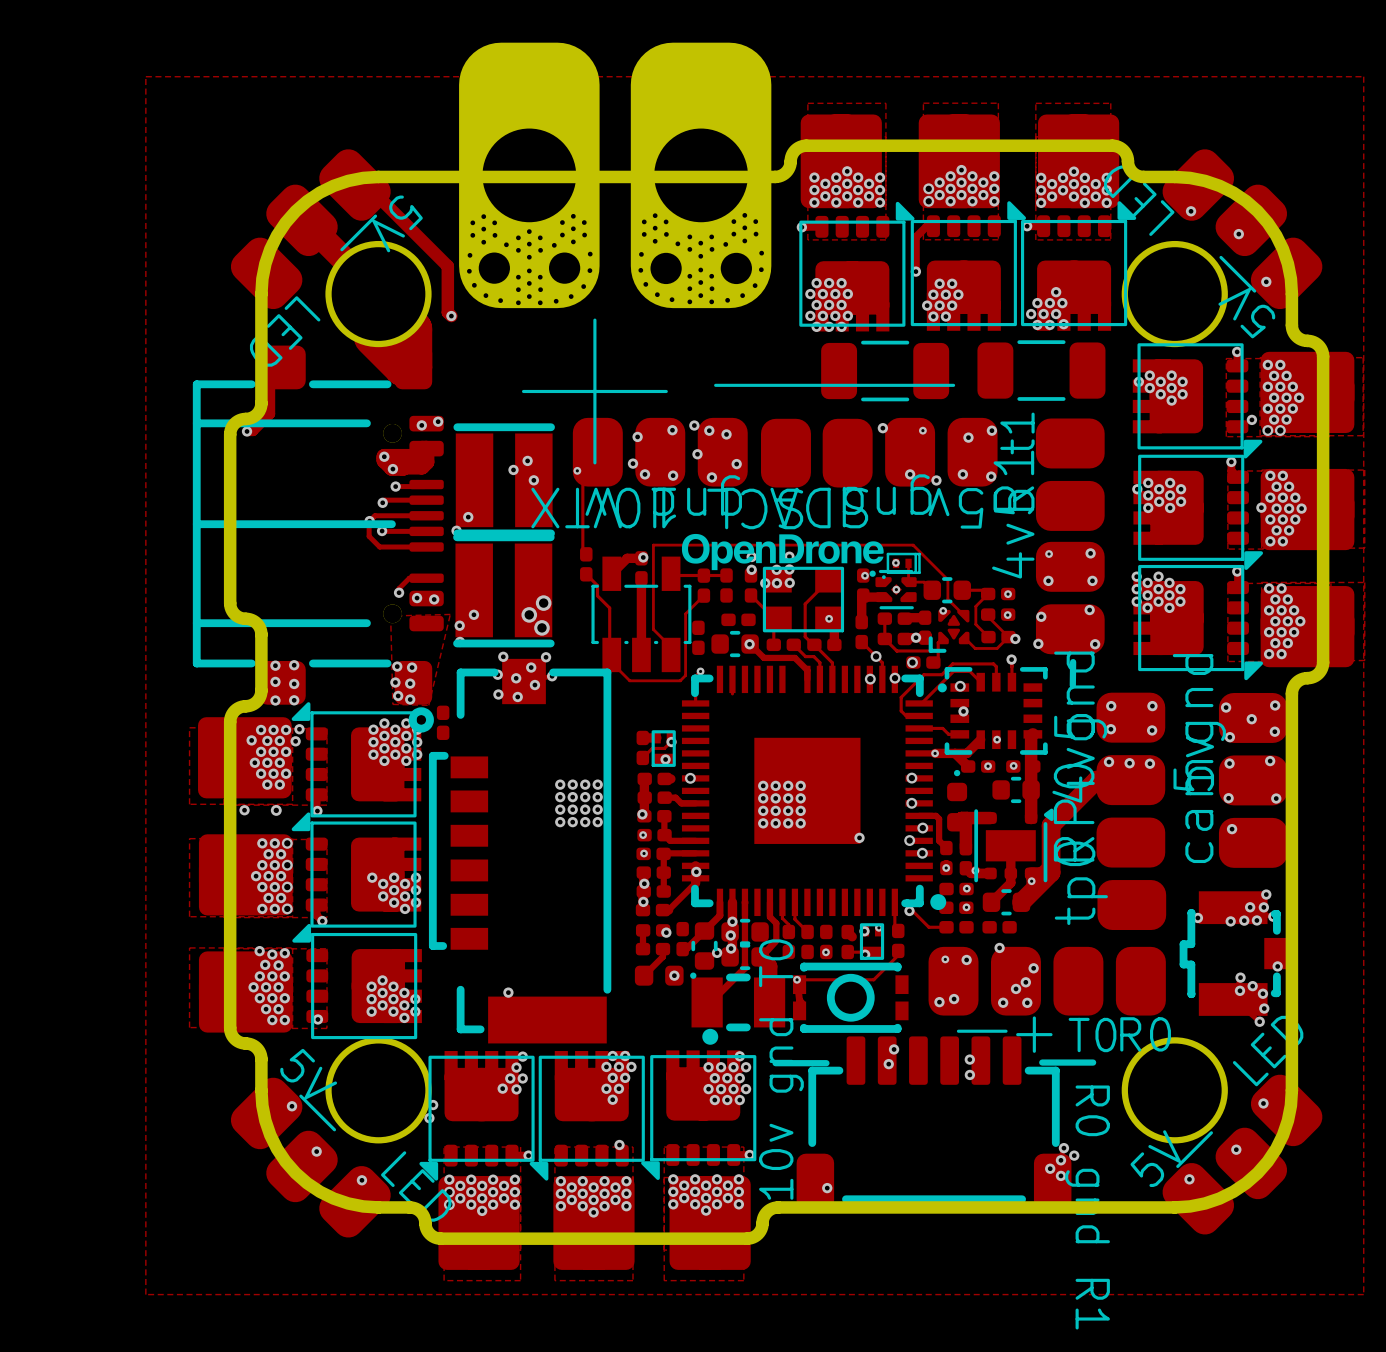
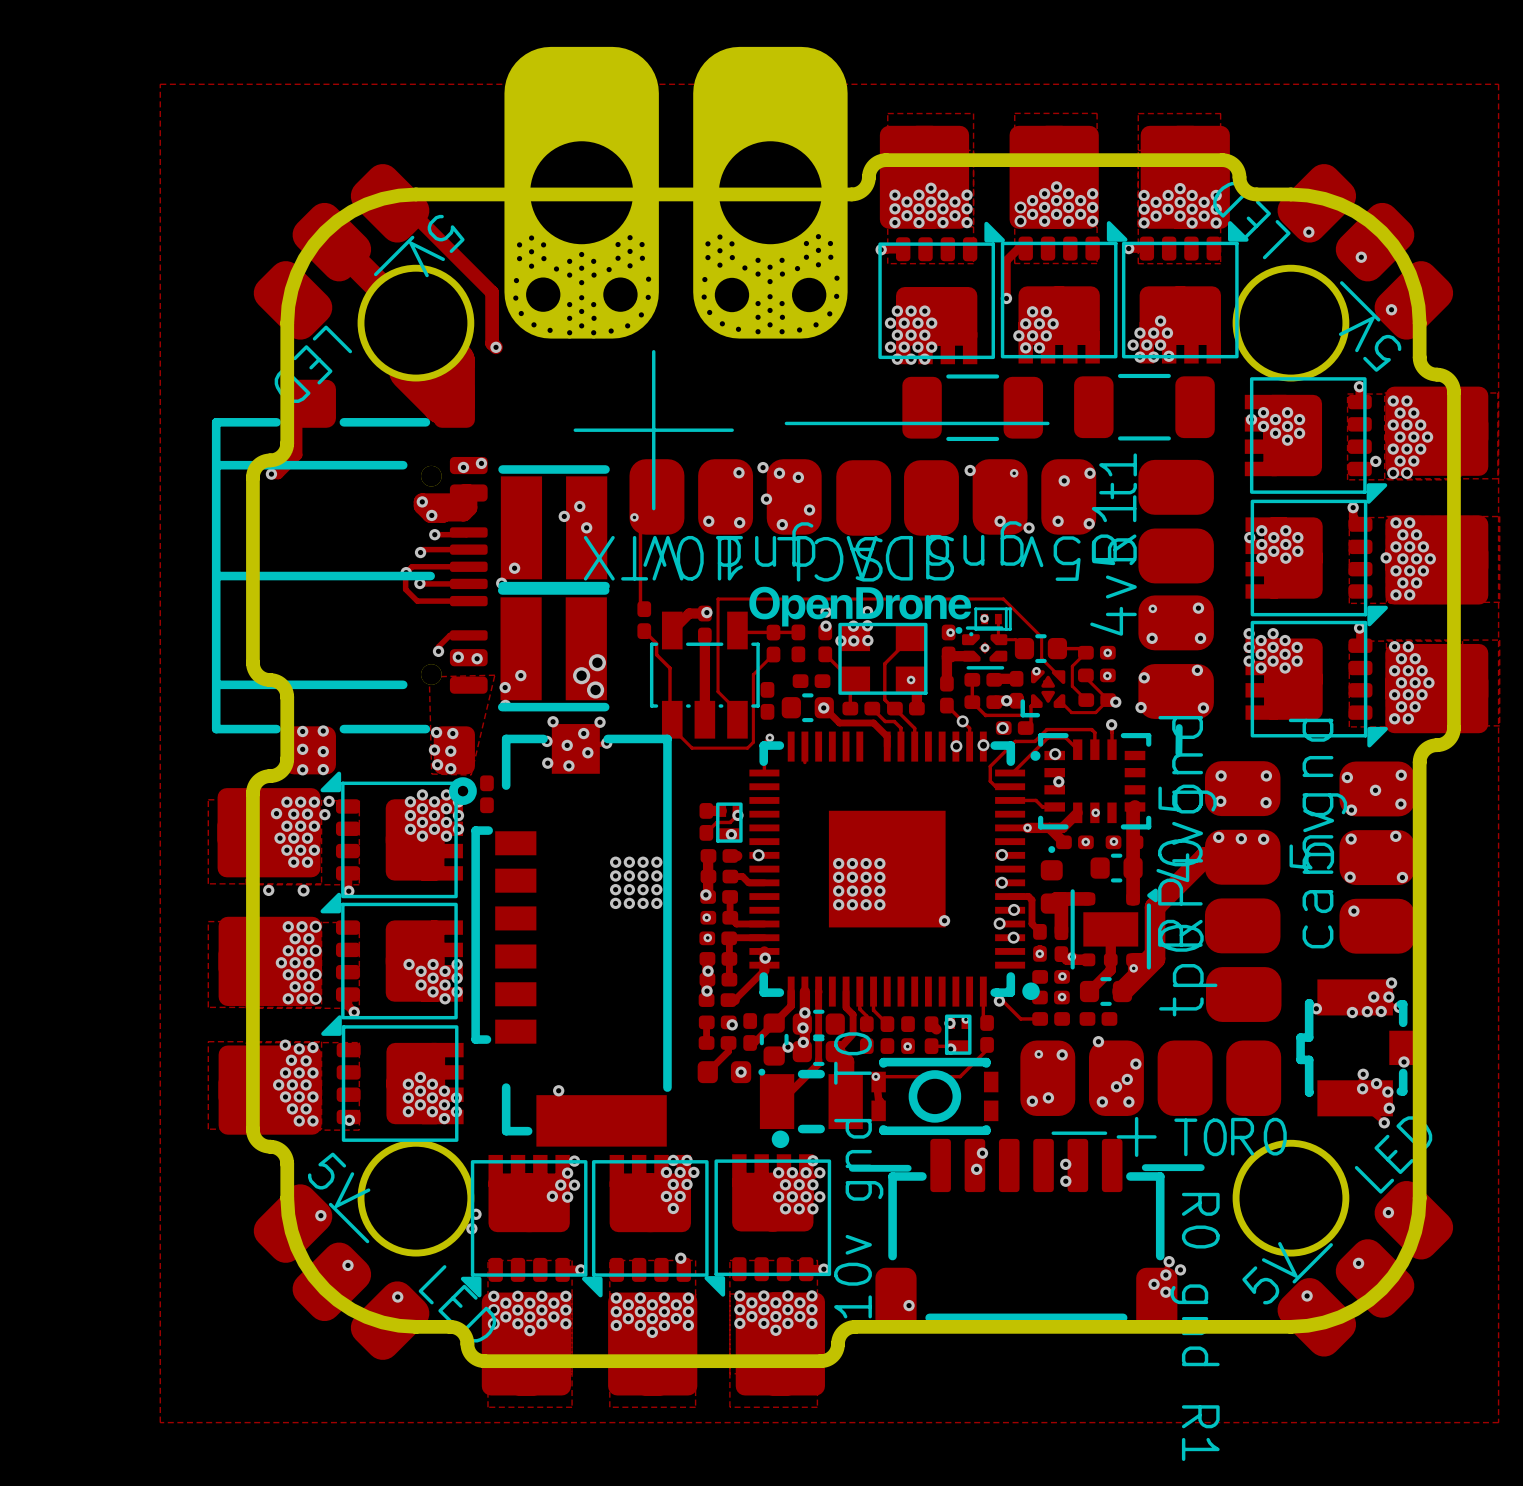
via: (637, 436) -> none
via: (633, 463) -> none

